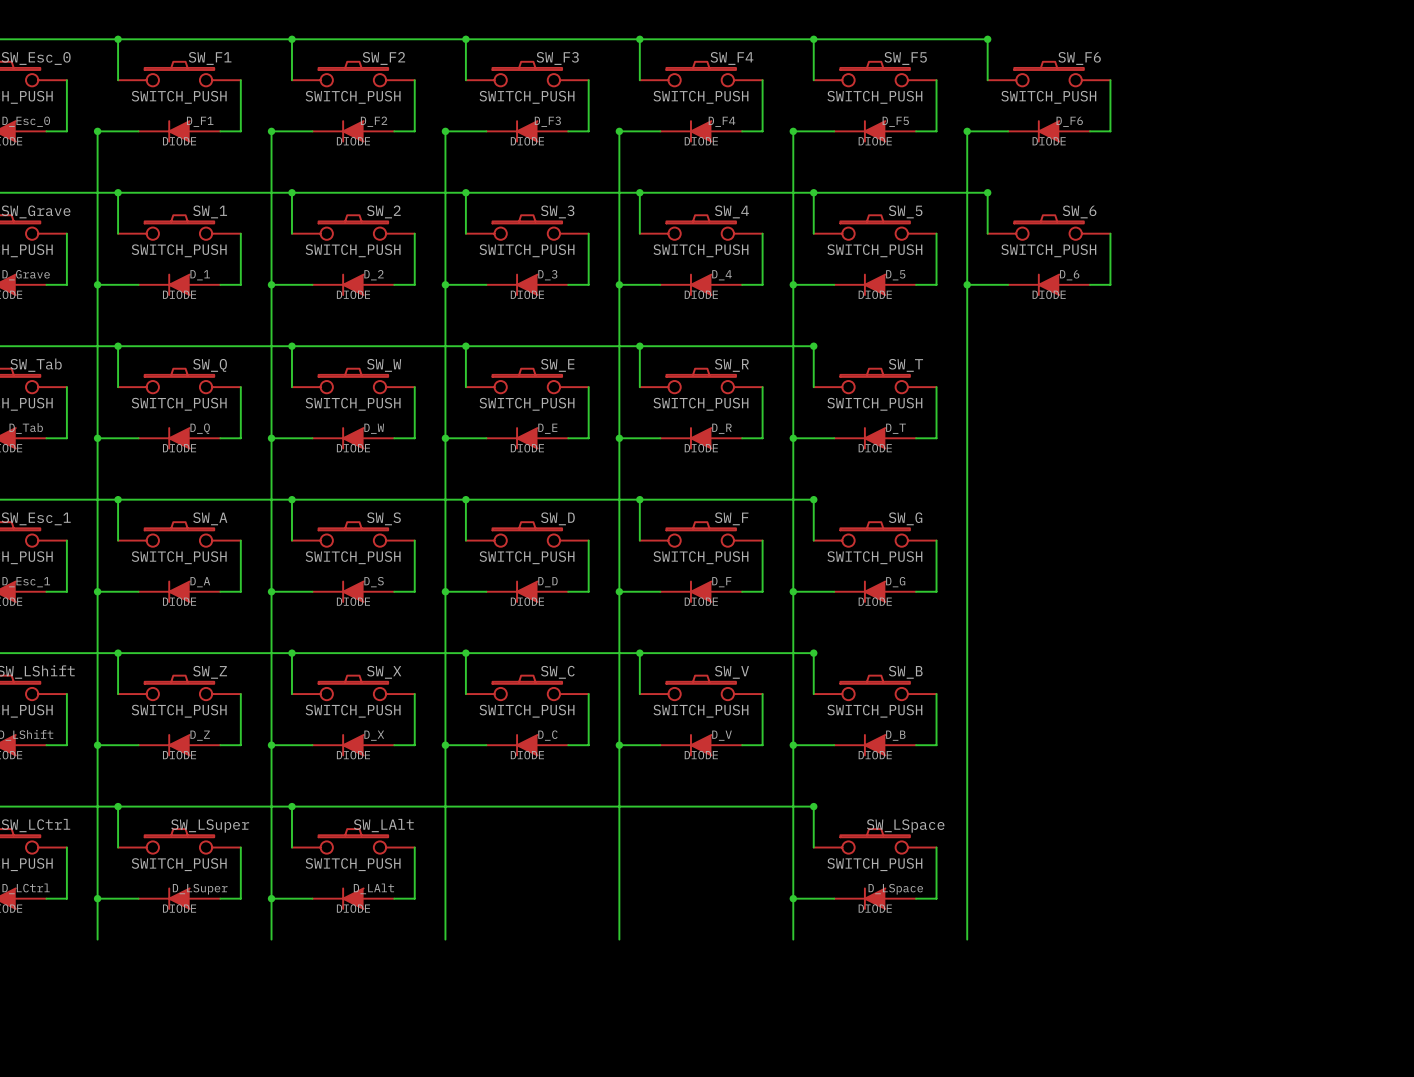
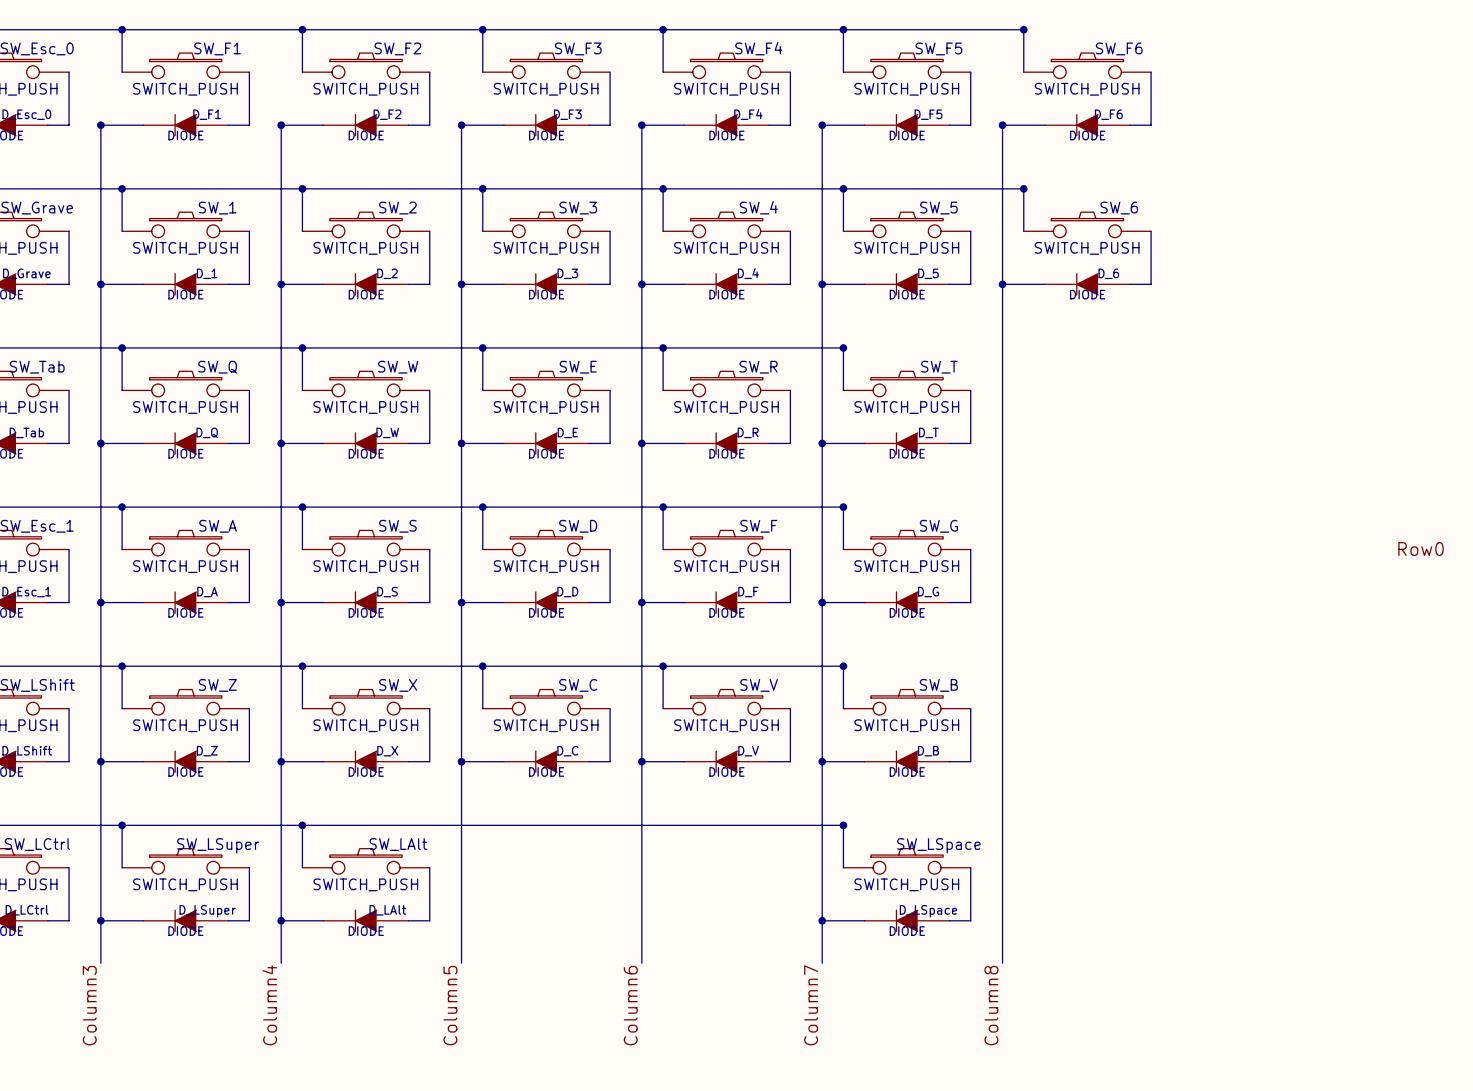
label: none -> Row0 (1421, 549)
label: none -> Column3 (89, 1005)
label: none -> Column4 (269, 1005)
label: none -> Column5 (450, 1005)
label: none -> Column6 (630, 1005)
label: none -> Column7 (811, 1005)
label: none -> Column8 (991, 1005)

